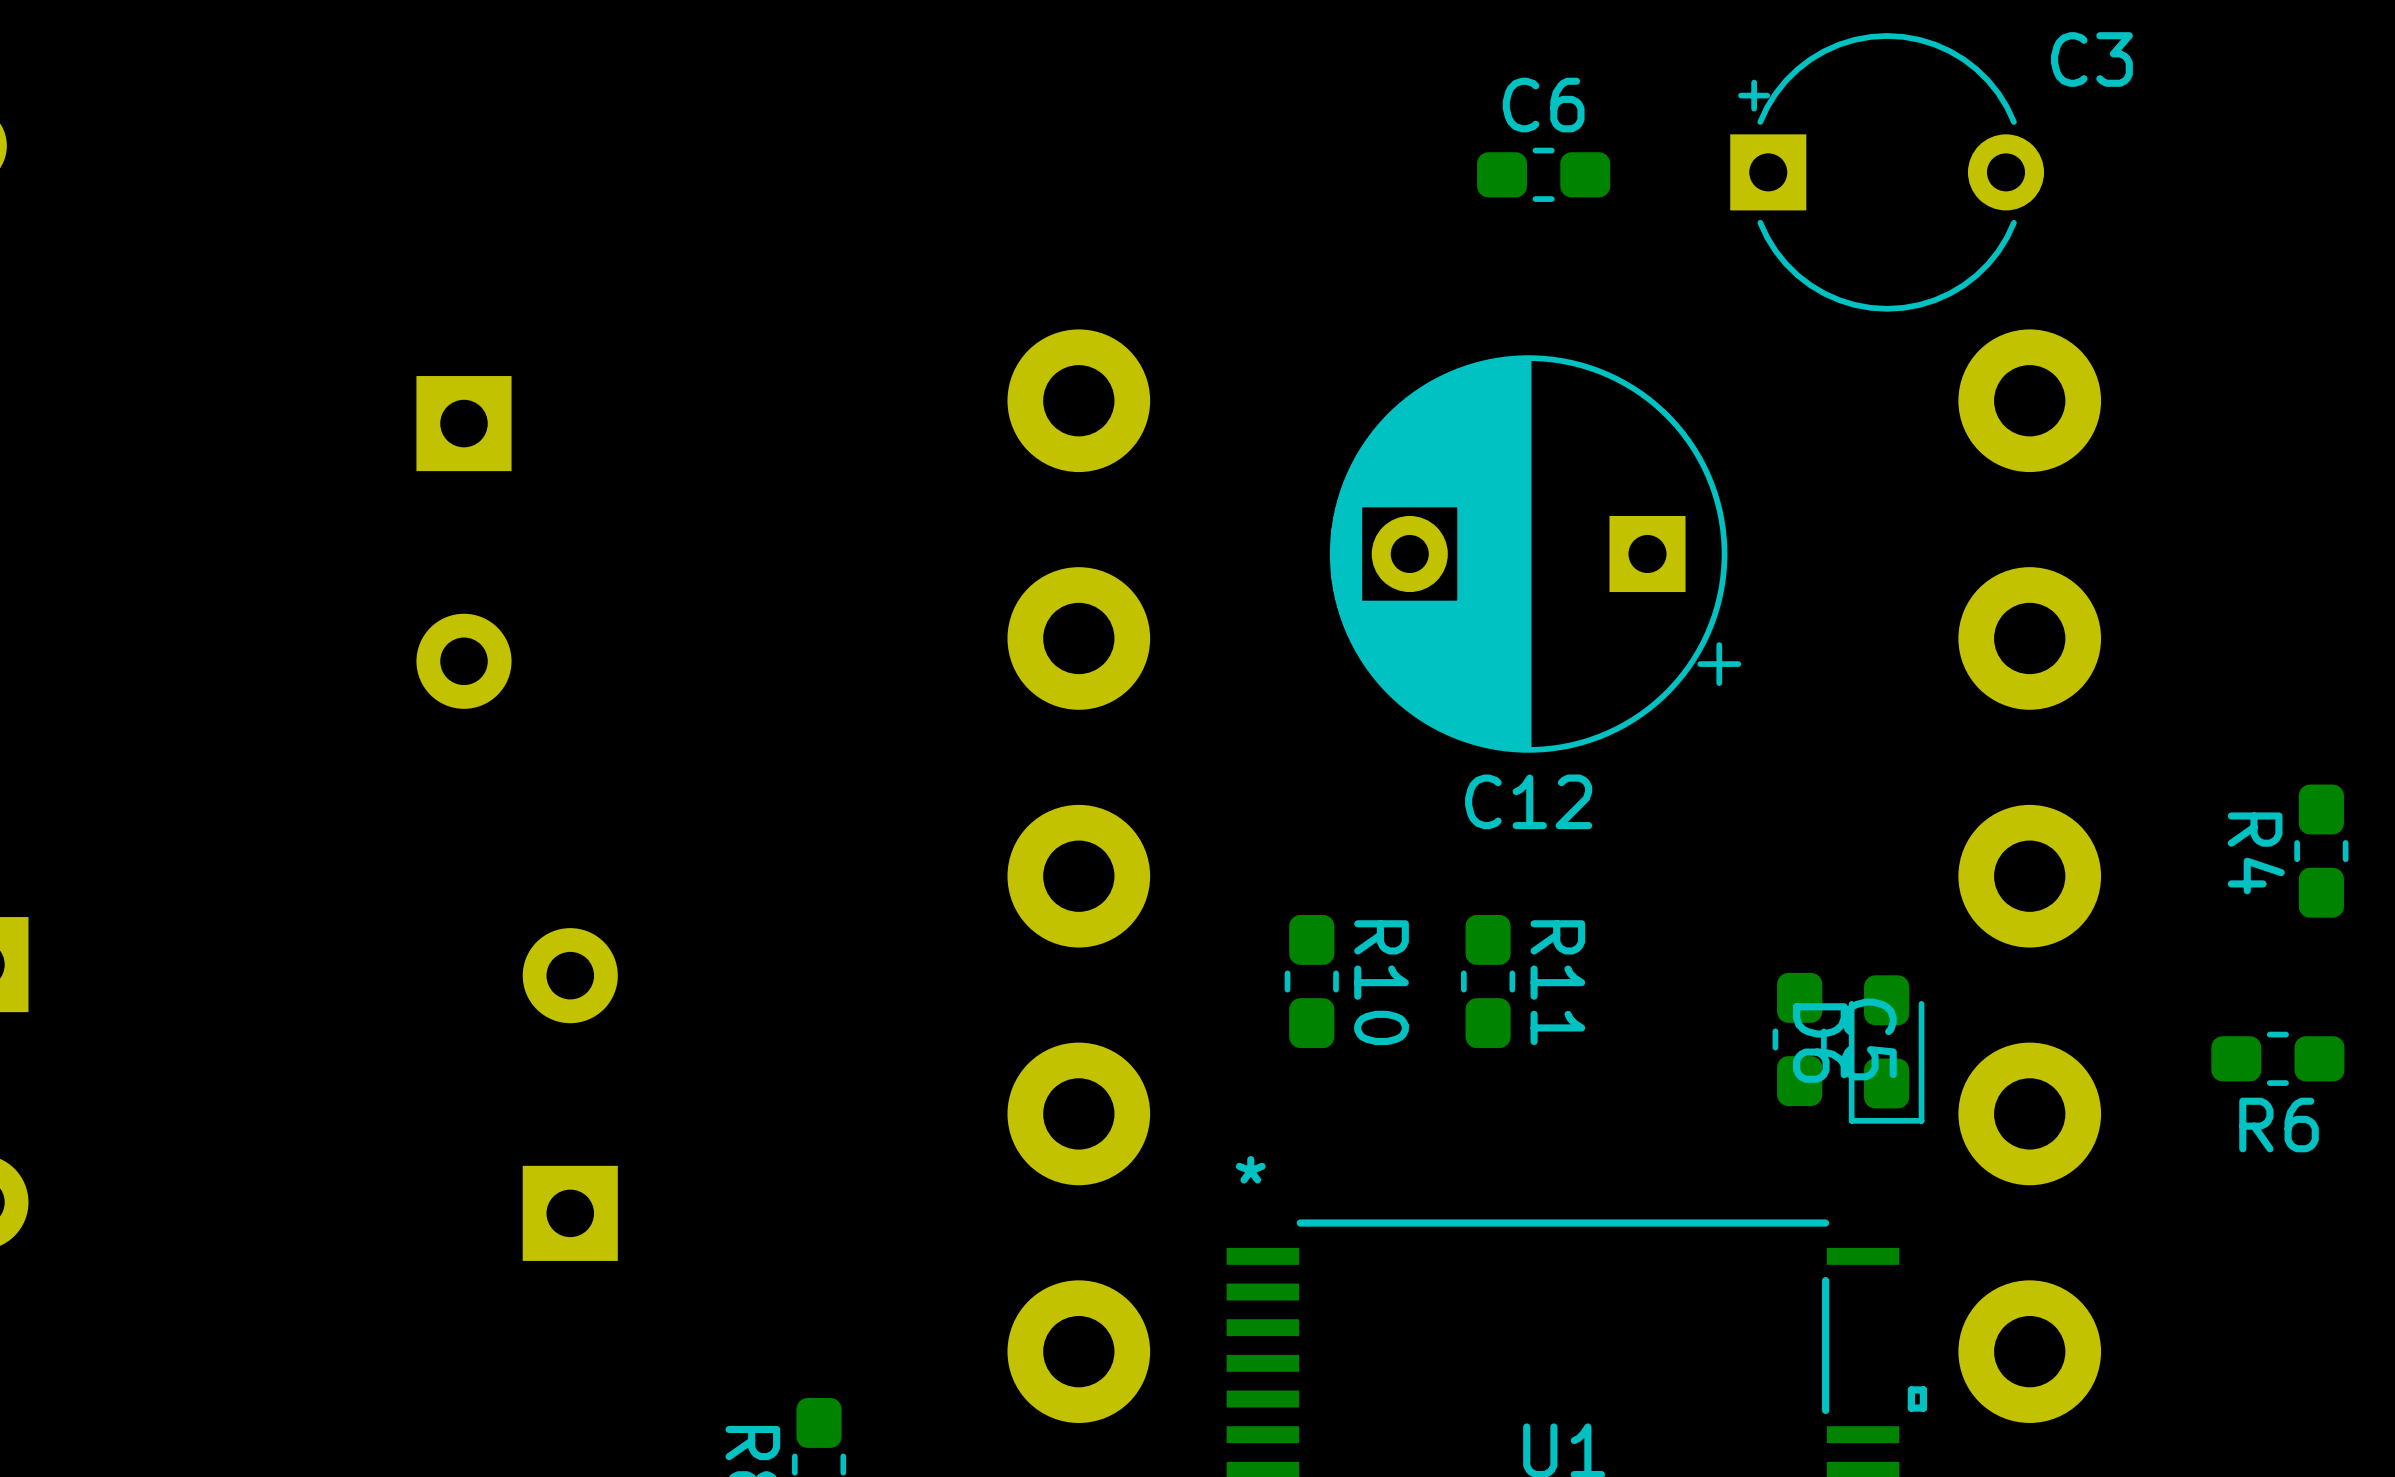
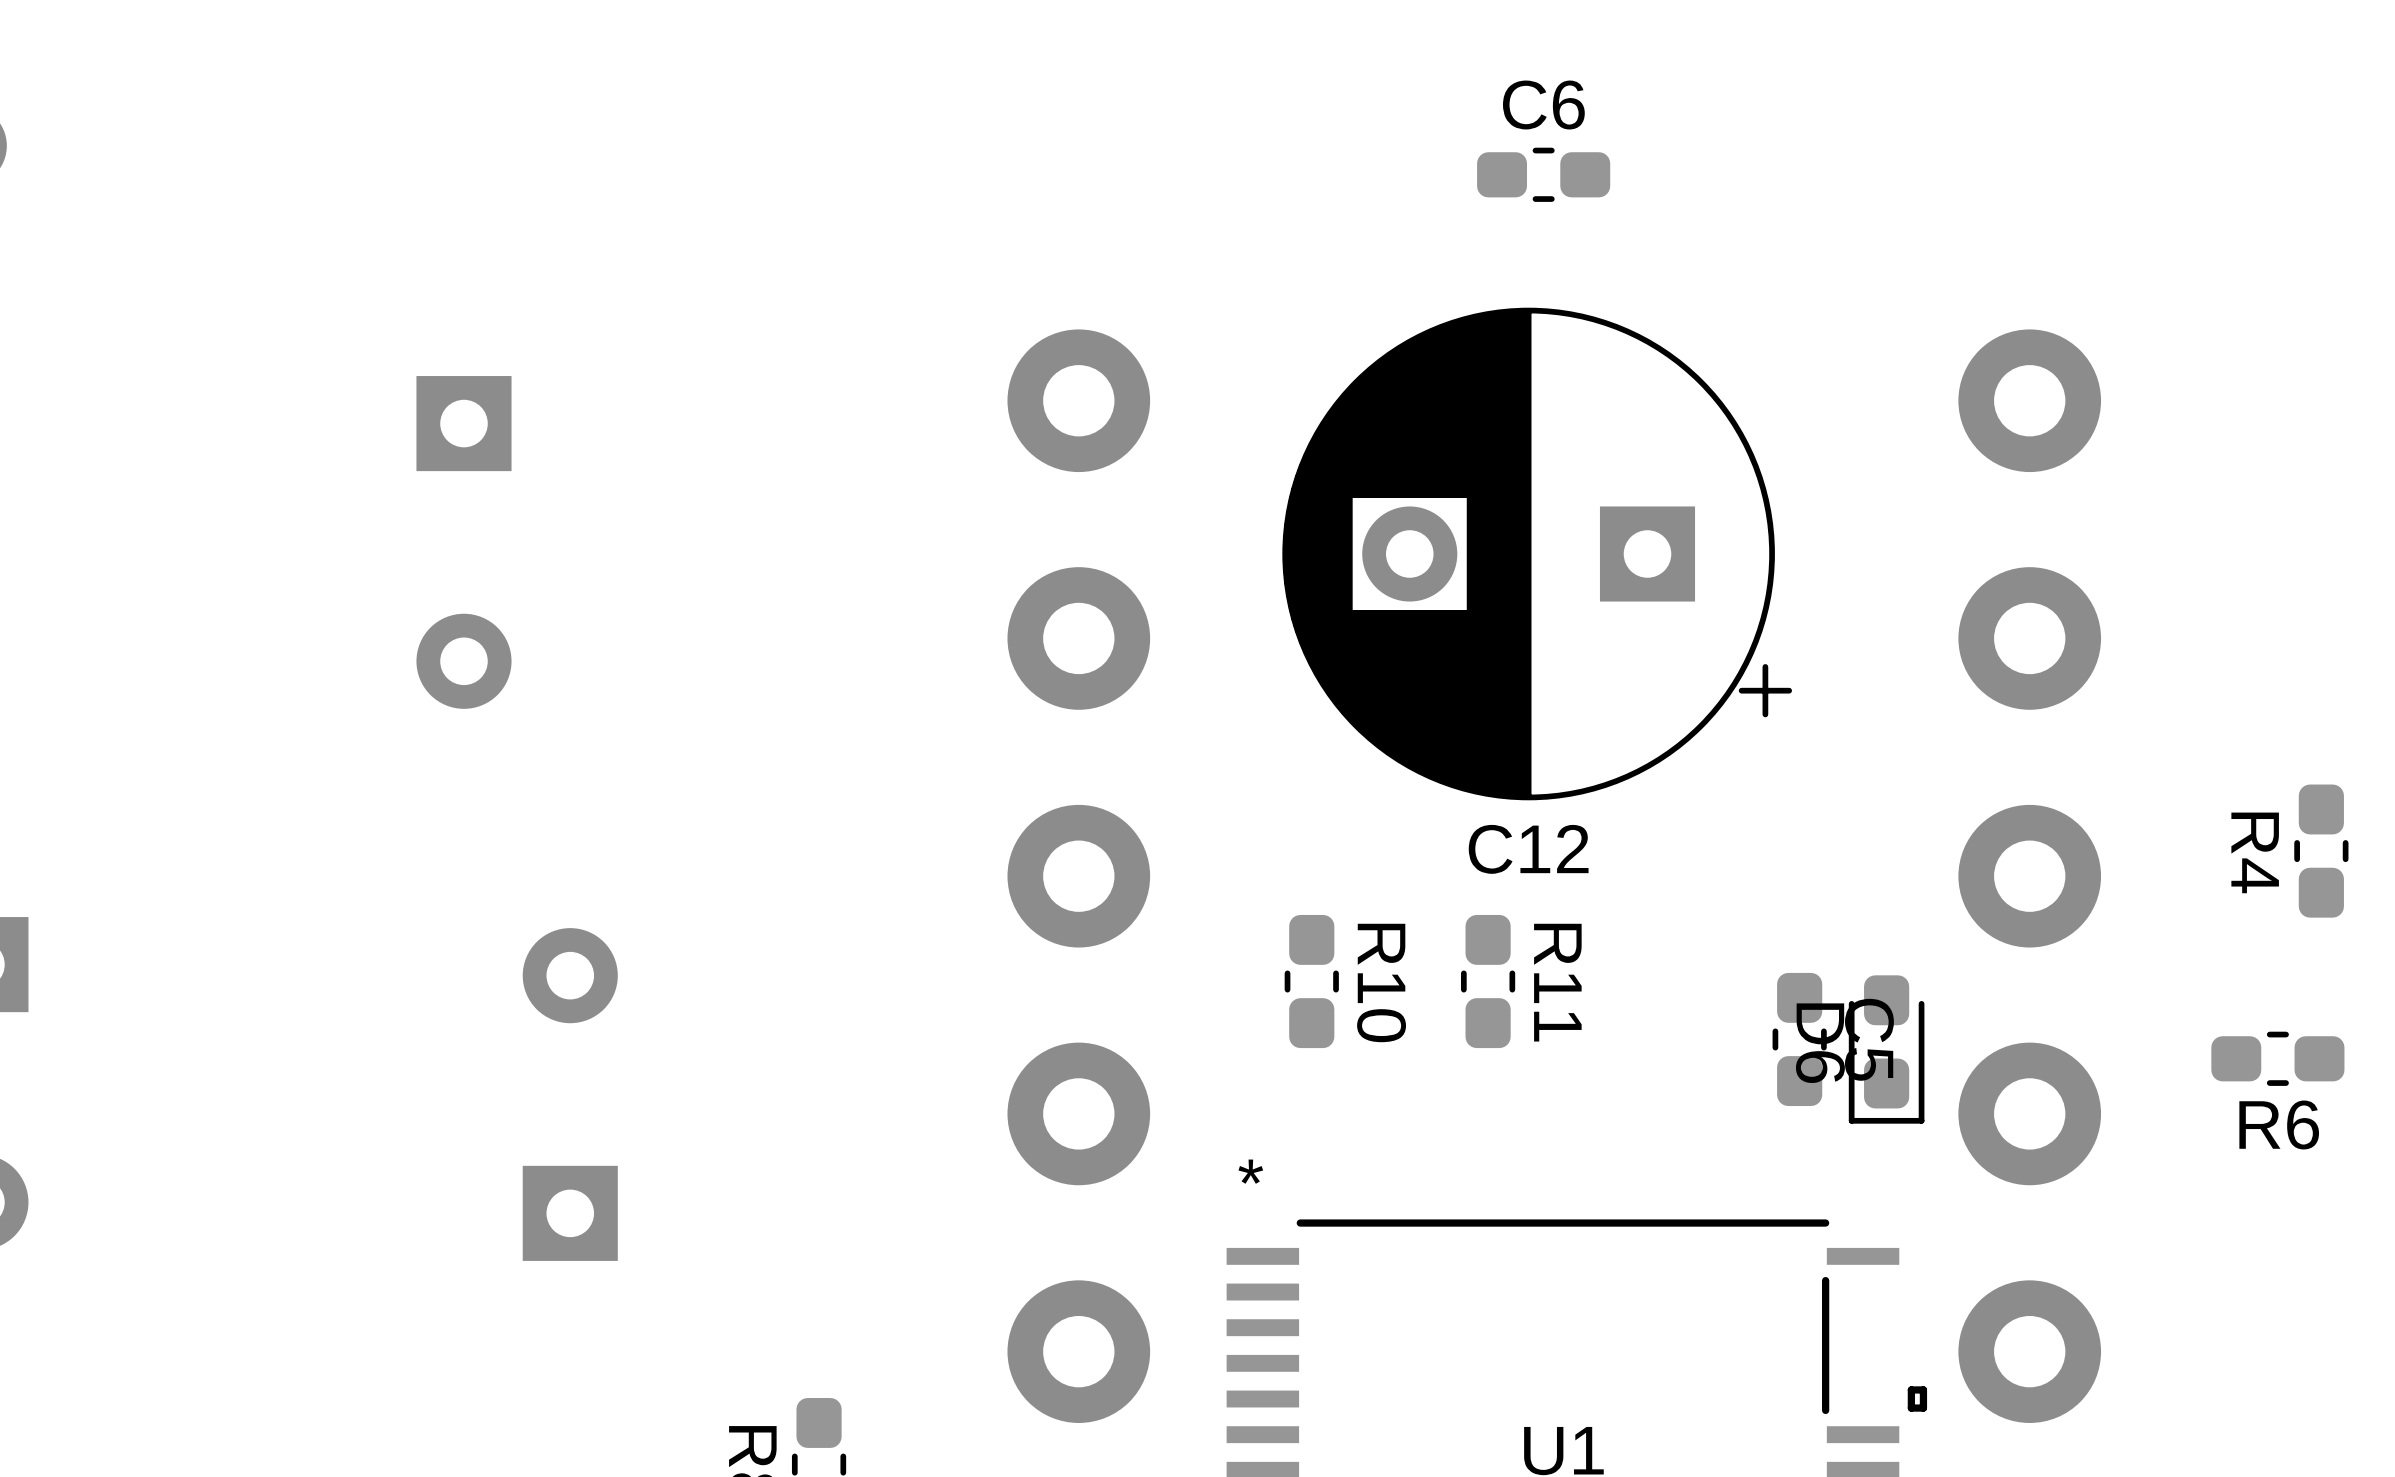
C3: (1887, 172) -> none
C12 footprint: [1329, 355, 1742, 753] -> [1282, 307, 1793, 801]

